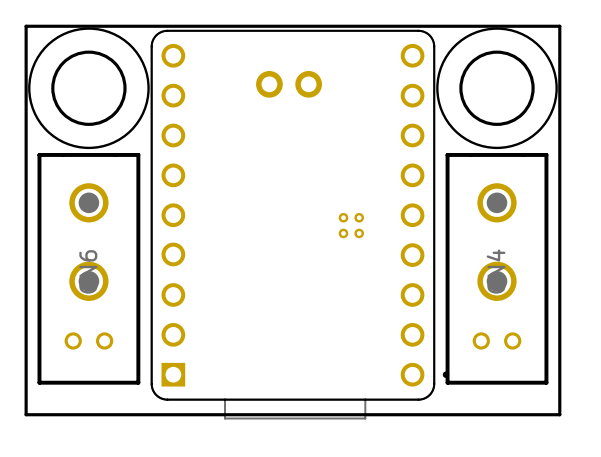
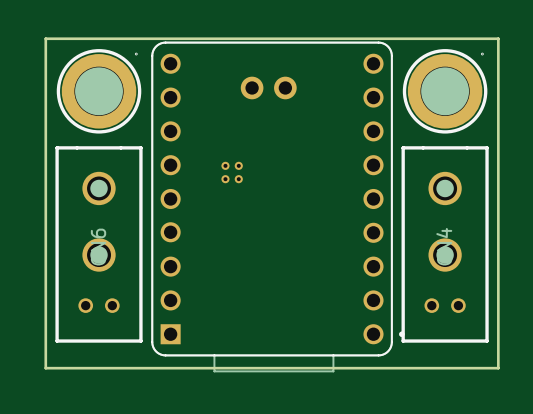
drawing: [28, 27, 150, 150] -> none
drawing: [436, 27, 558, 150] -> none
round board edge: [51, 50, 127, 126] -> none
round board edge: [459, 50, 535, 126] -> none
part: none -> (99, 91)
part: none -> (445, 91)
part position: (351, 225) -> (232, 172)

